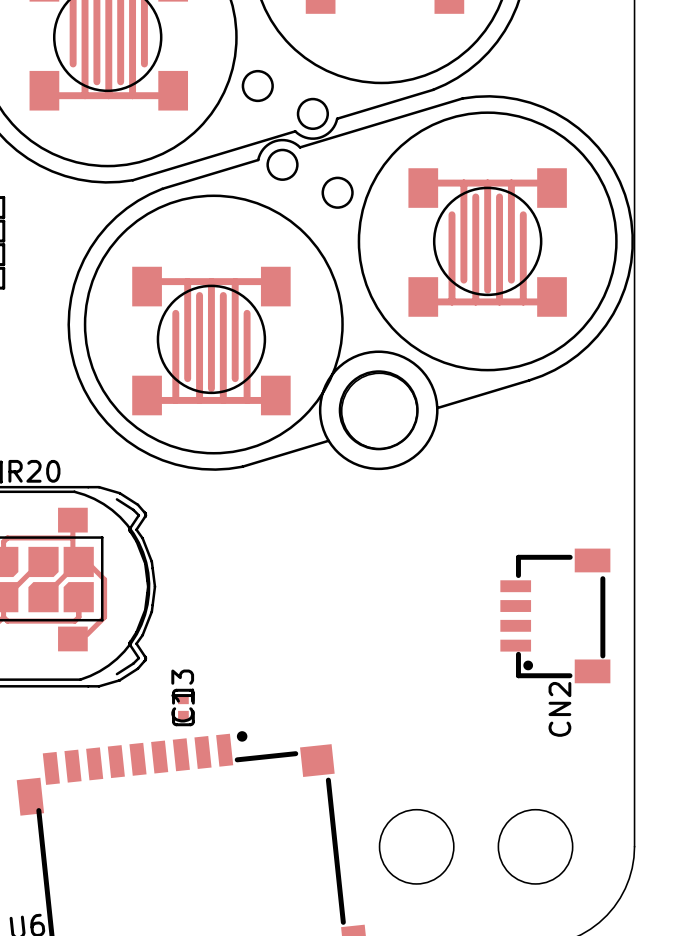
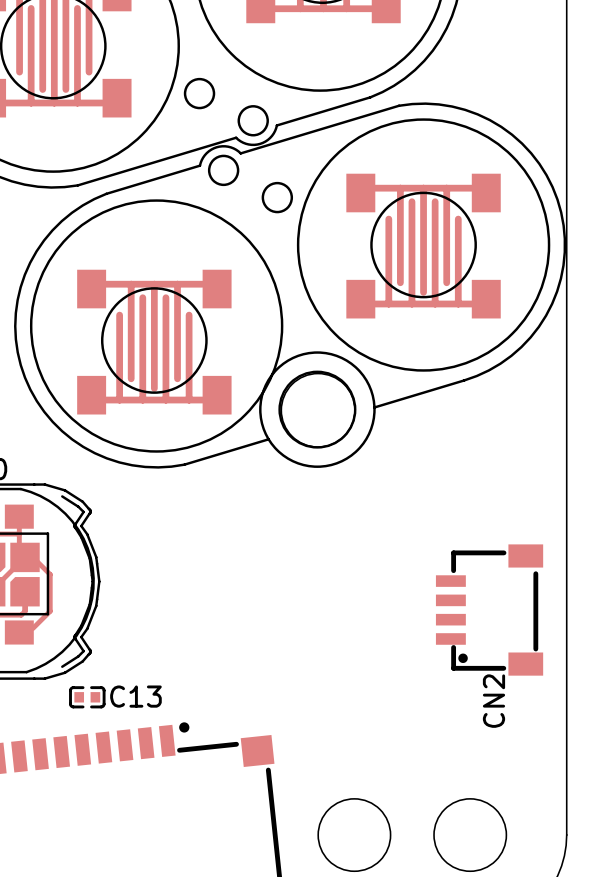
C13 rotation: 0° (183, 707) -> 90° clockwise (87, 697)
C13 position: (183, 707) -> (87, 697)

